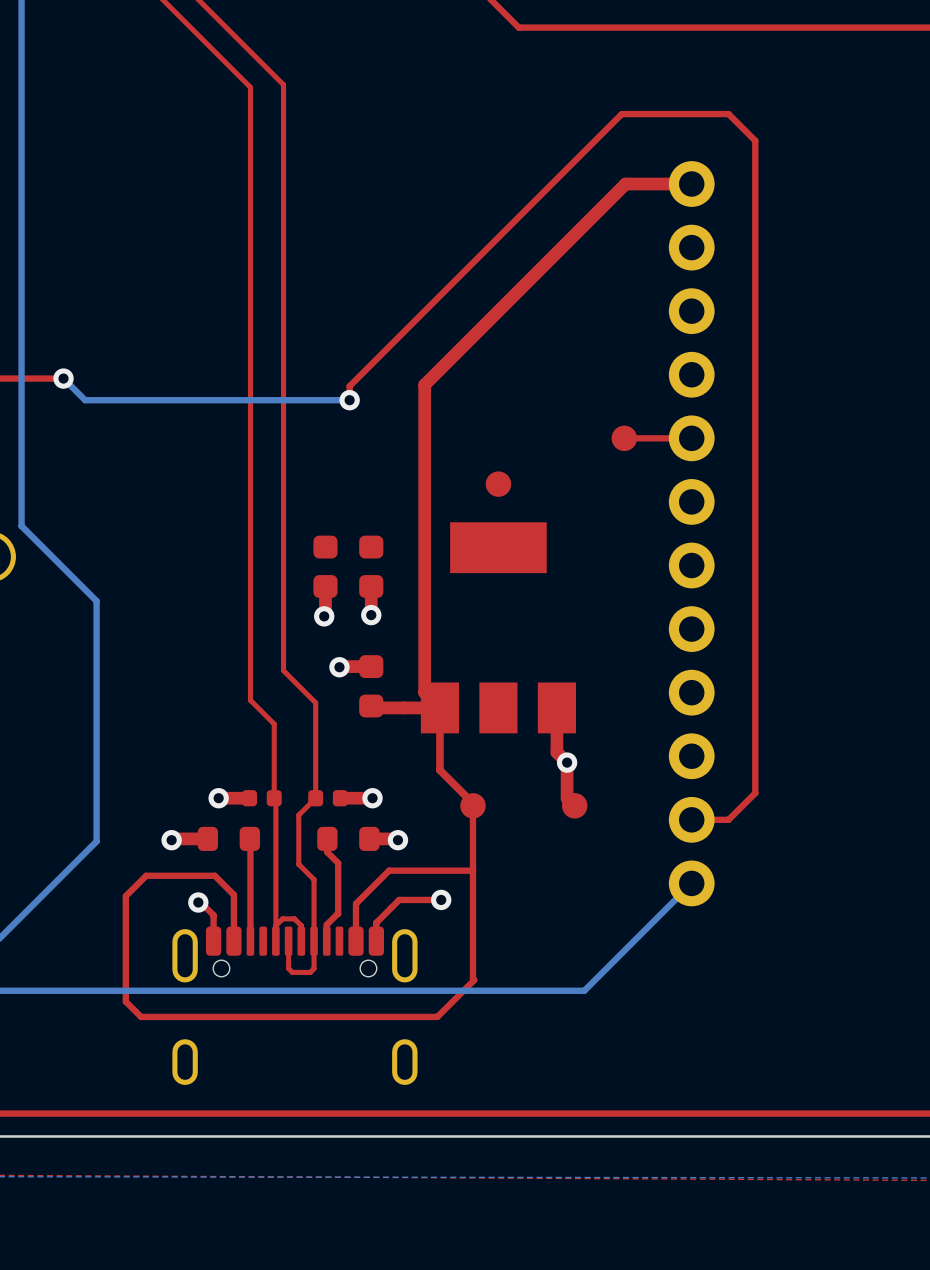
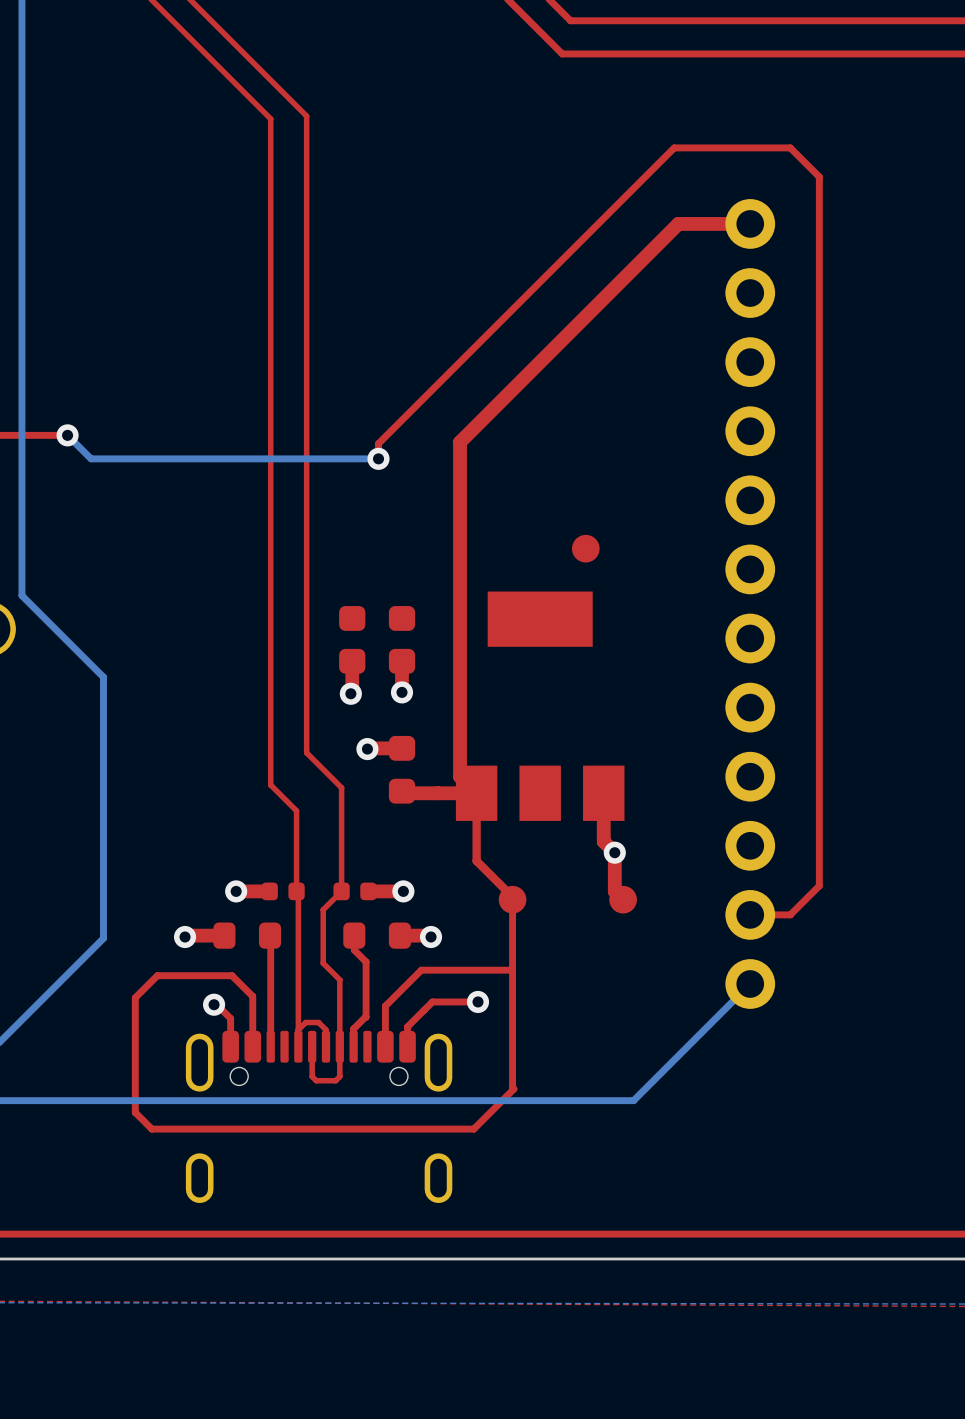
part: (624, 438) -> none
top track: (691, 438) (624, 438) -> none
part position: (498, 484) -> (585, 548)

